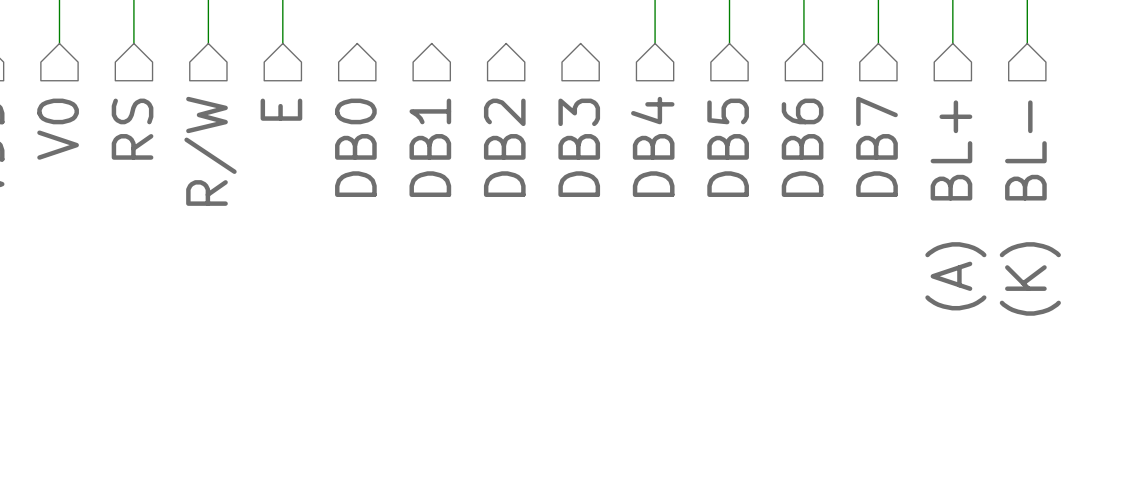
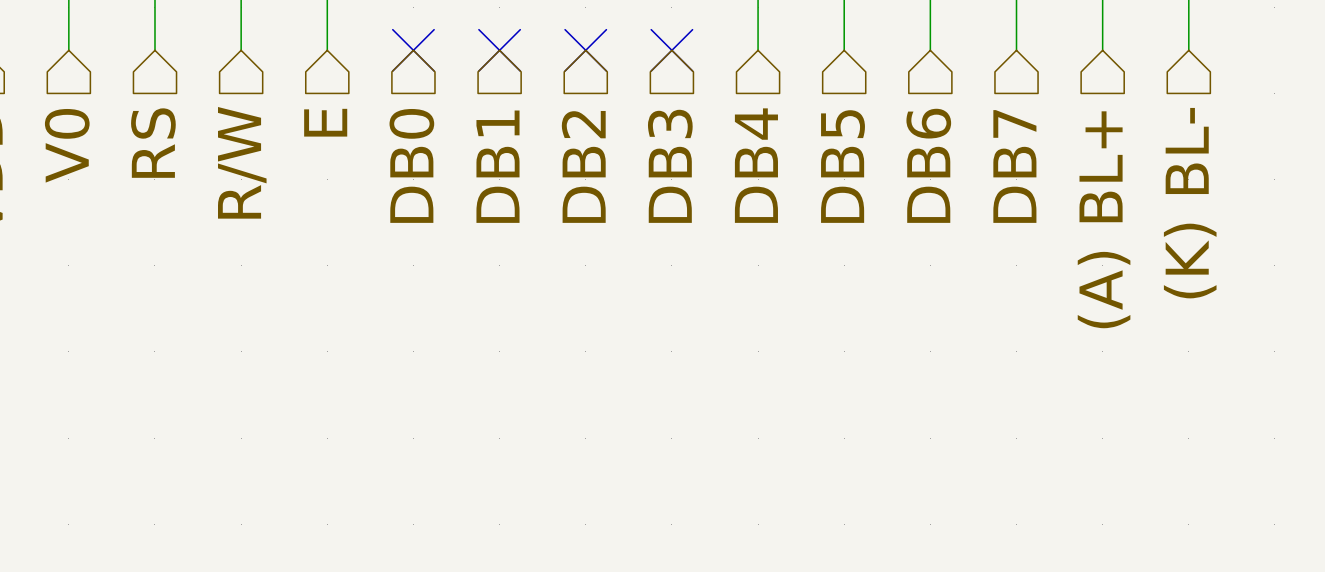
no-connect mark: none -> (413, 50)
no-connect mark: none -> (499, 50)
no-connect mark: none -> (585, 50)
no-connect mark: none -> (671, 50)

